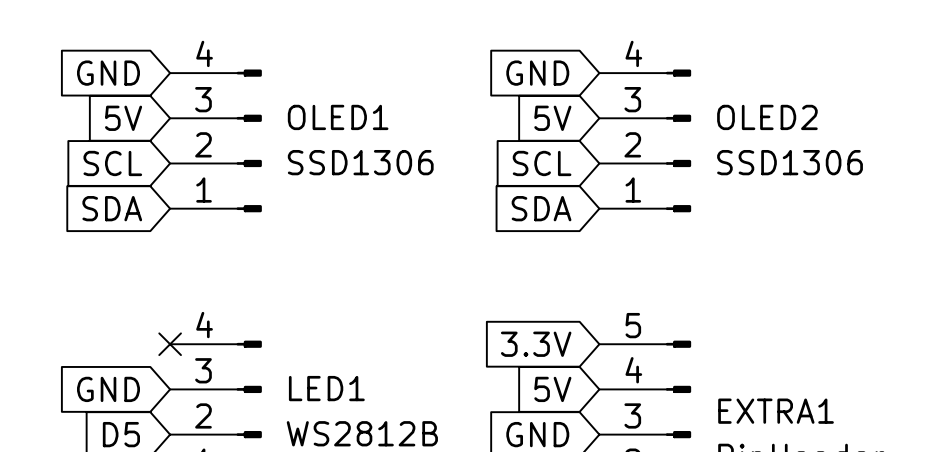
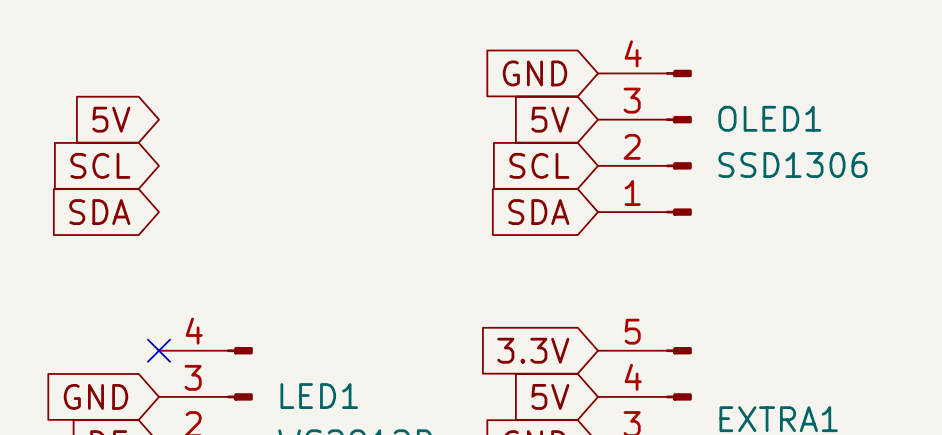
global label: GND (108, 73) -> none
OLED2 name: OLED2 (767, 117) -> OLED1 (769, 118)
OLED1: SSD1306 (215, 140) -> none

